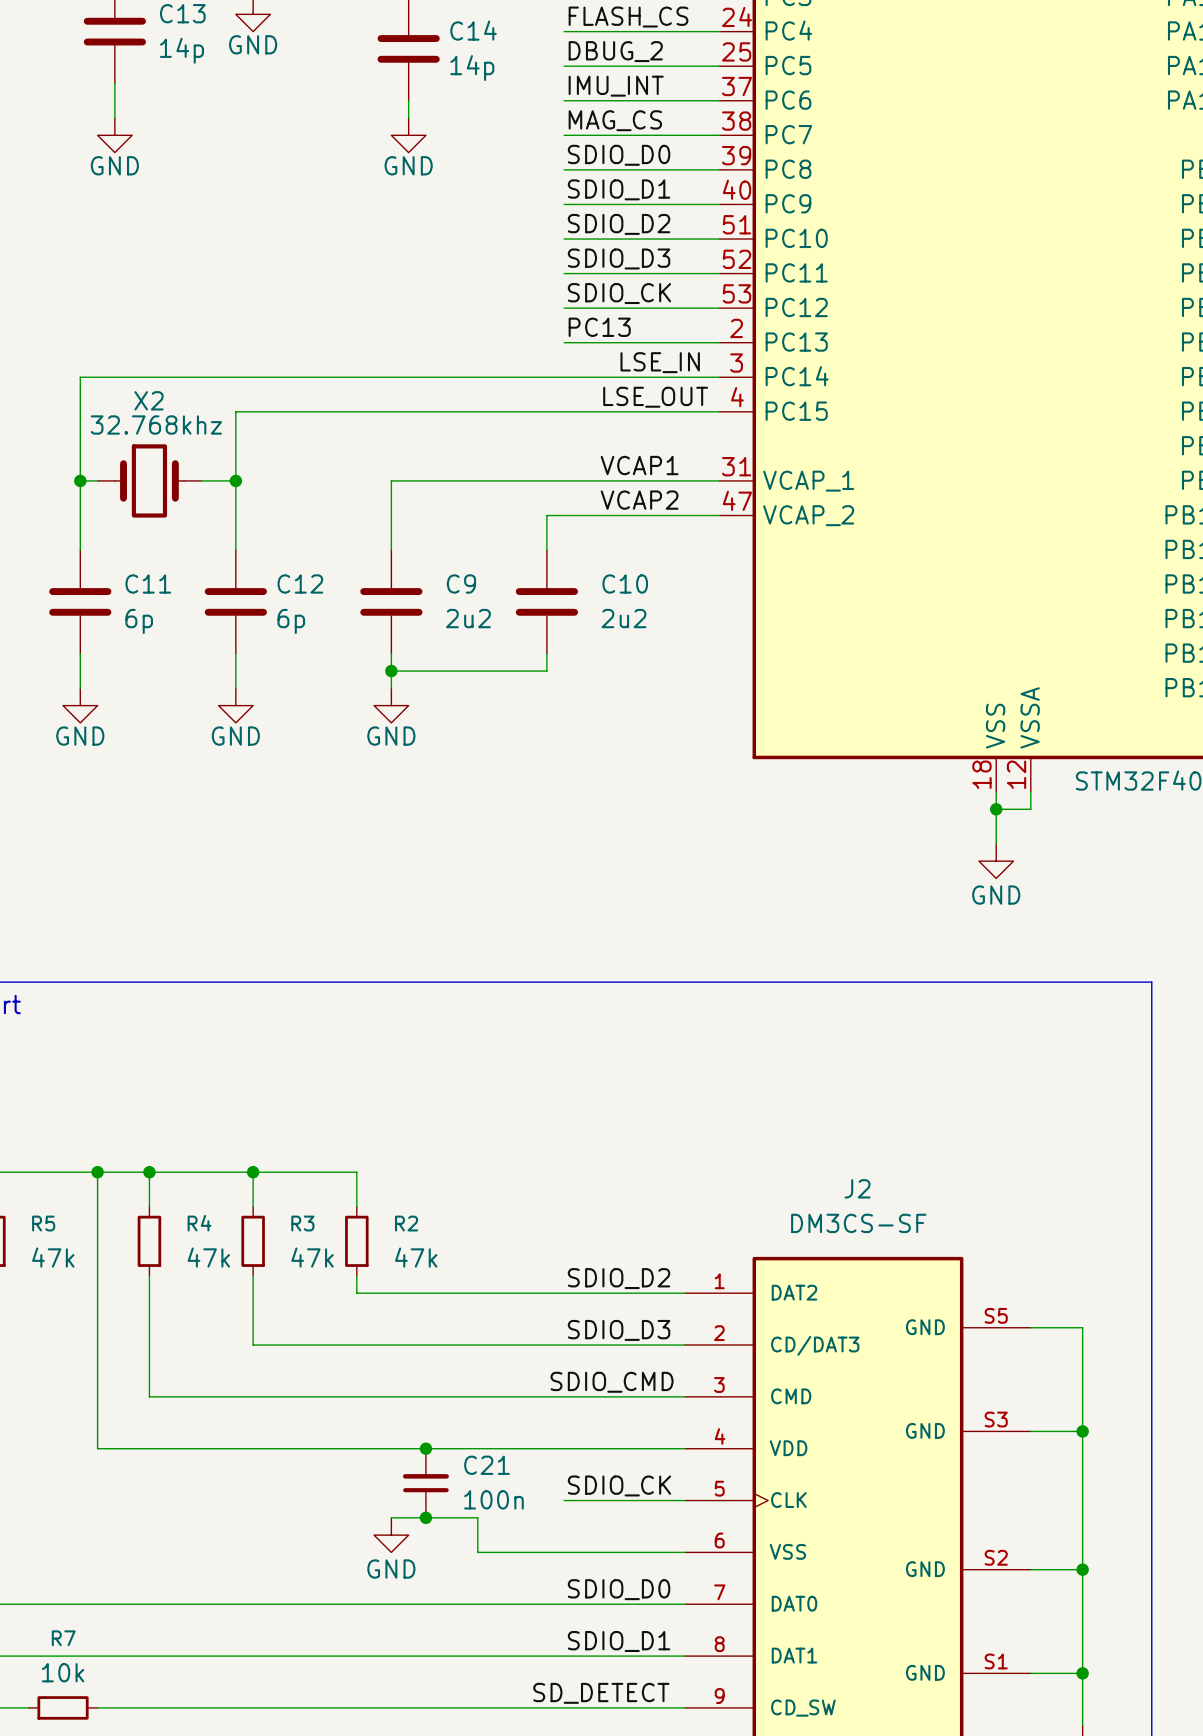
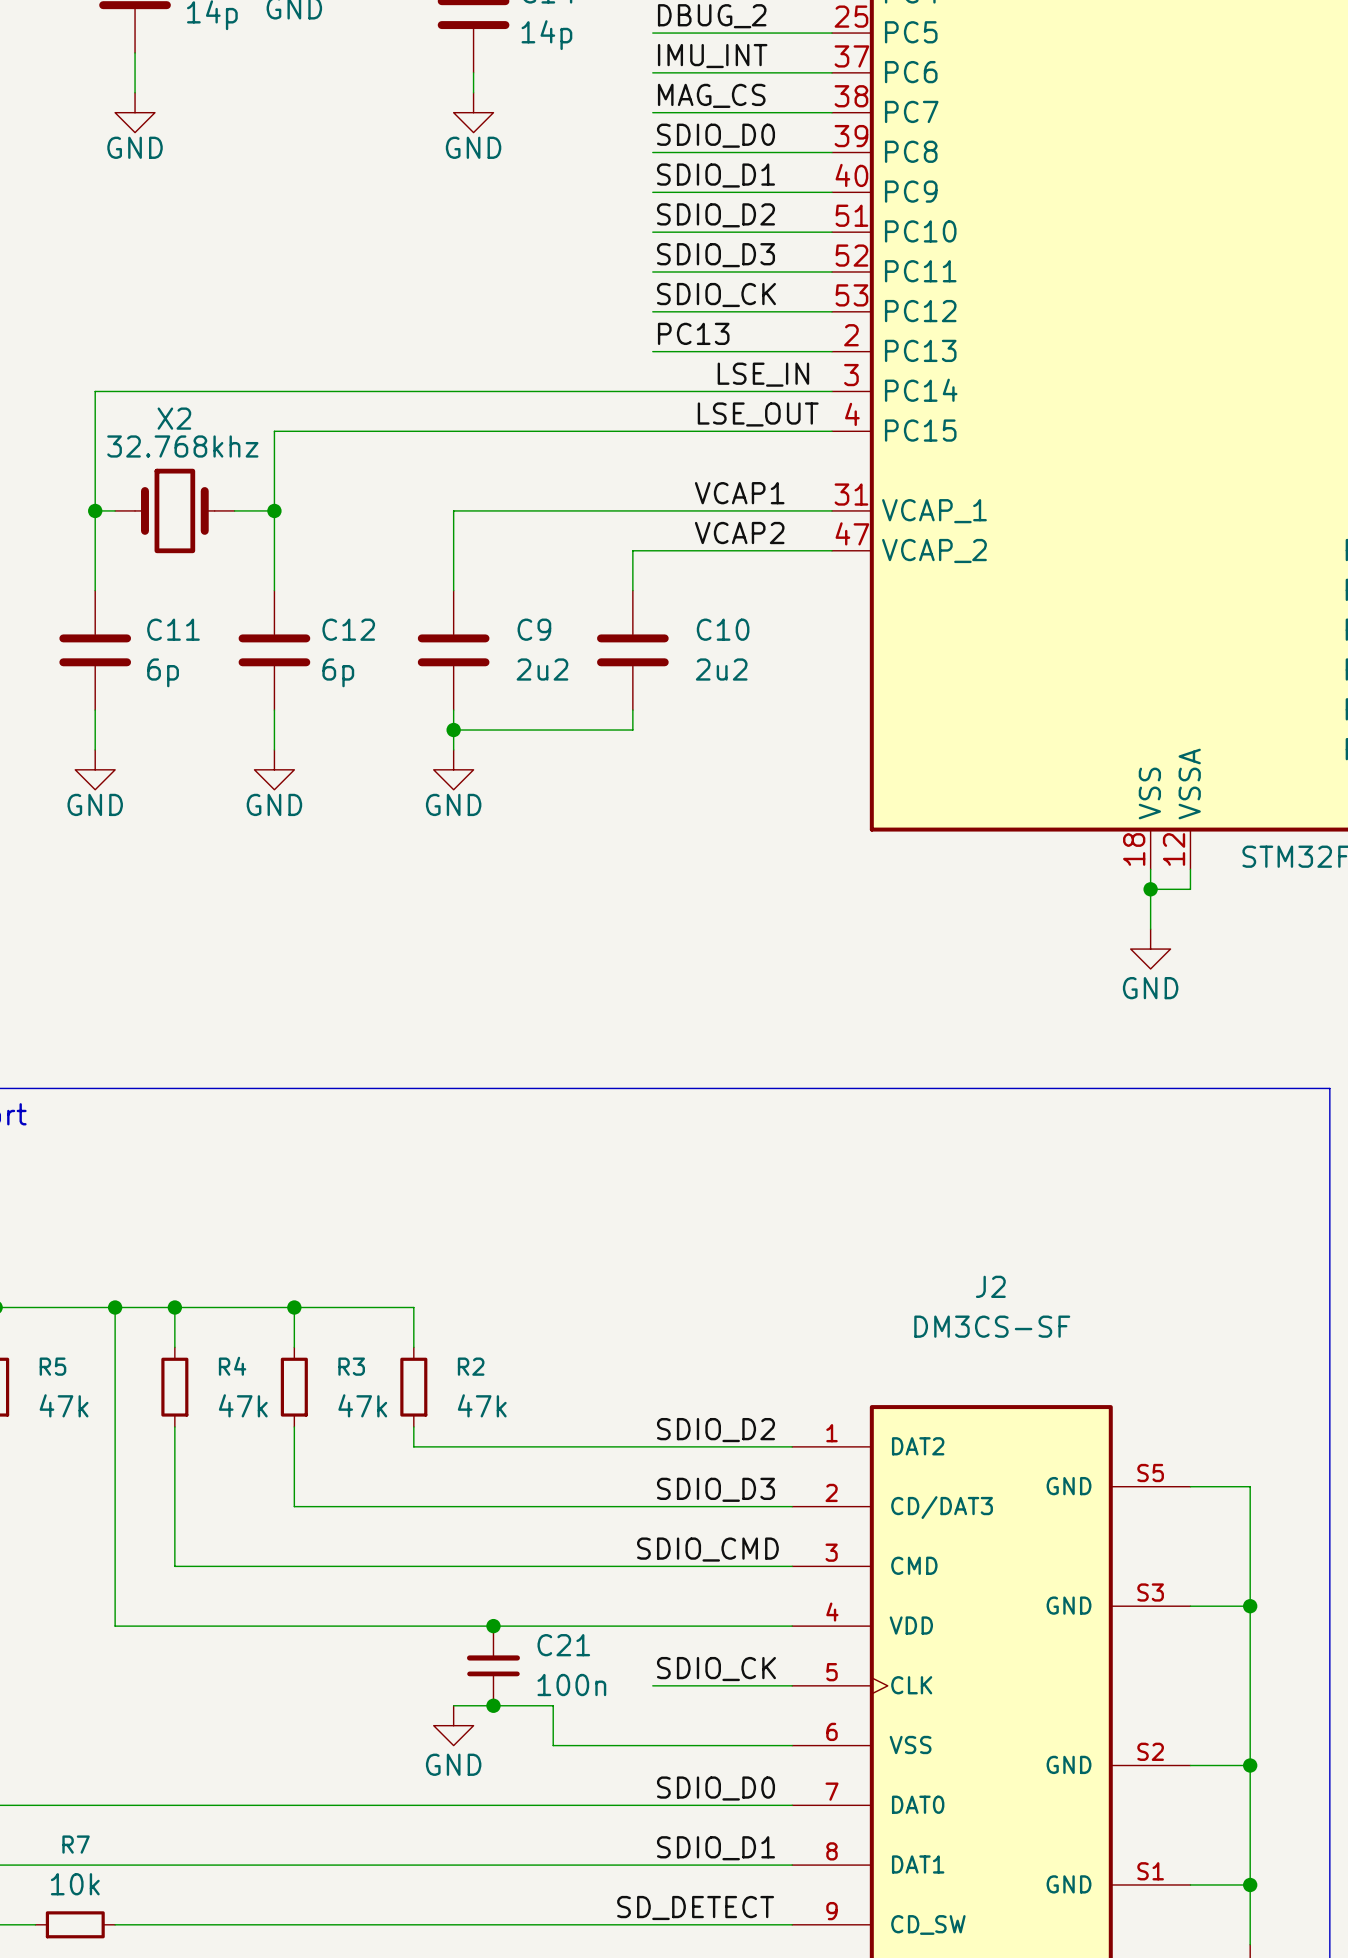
J2 name position: J2 (857, 1188) -> J2 (990, 1286)
J2 value position: DM3CS-SF (858, 1223) -> DM3CS-SF (992, 1326)

